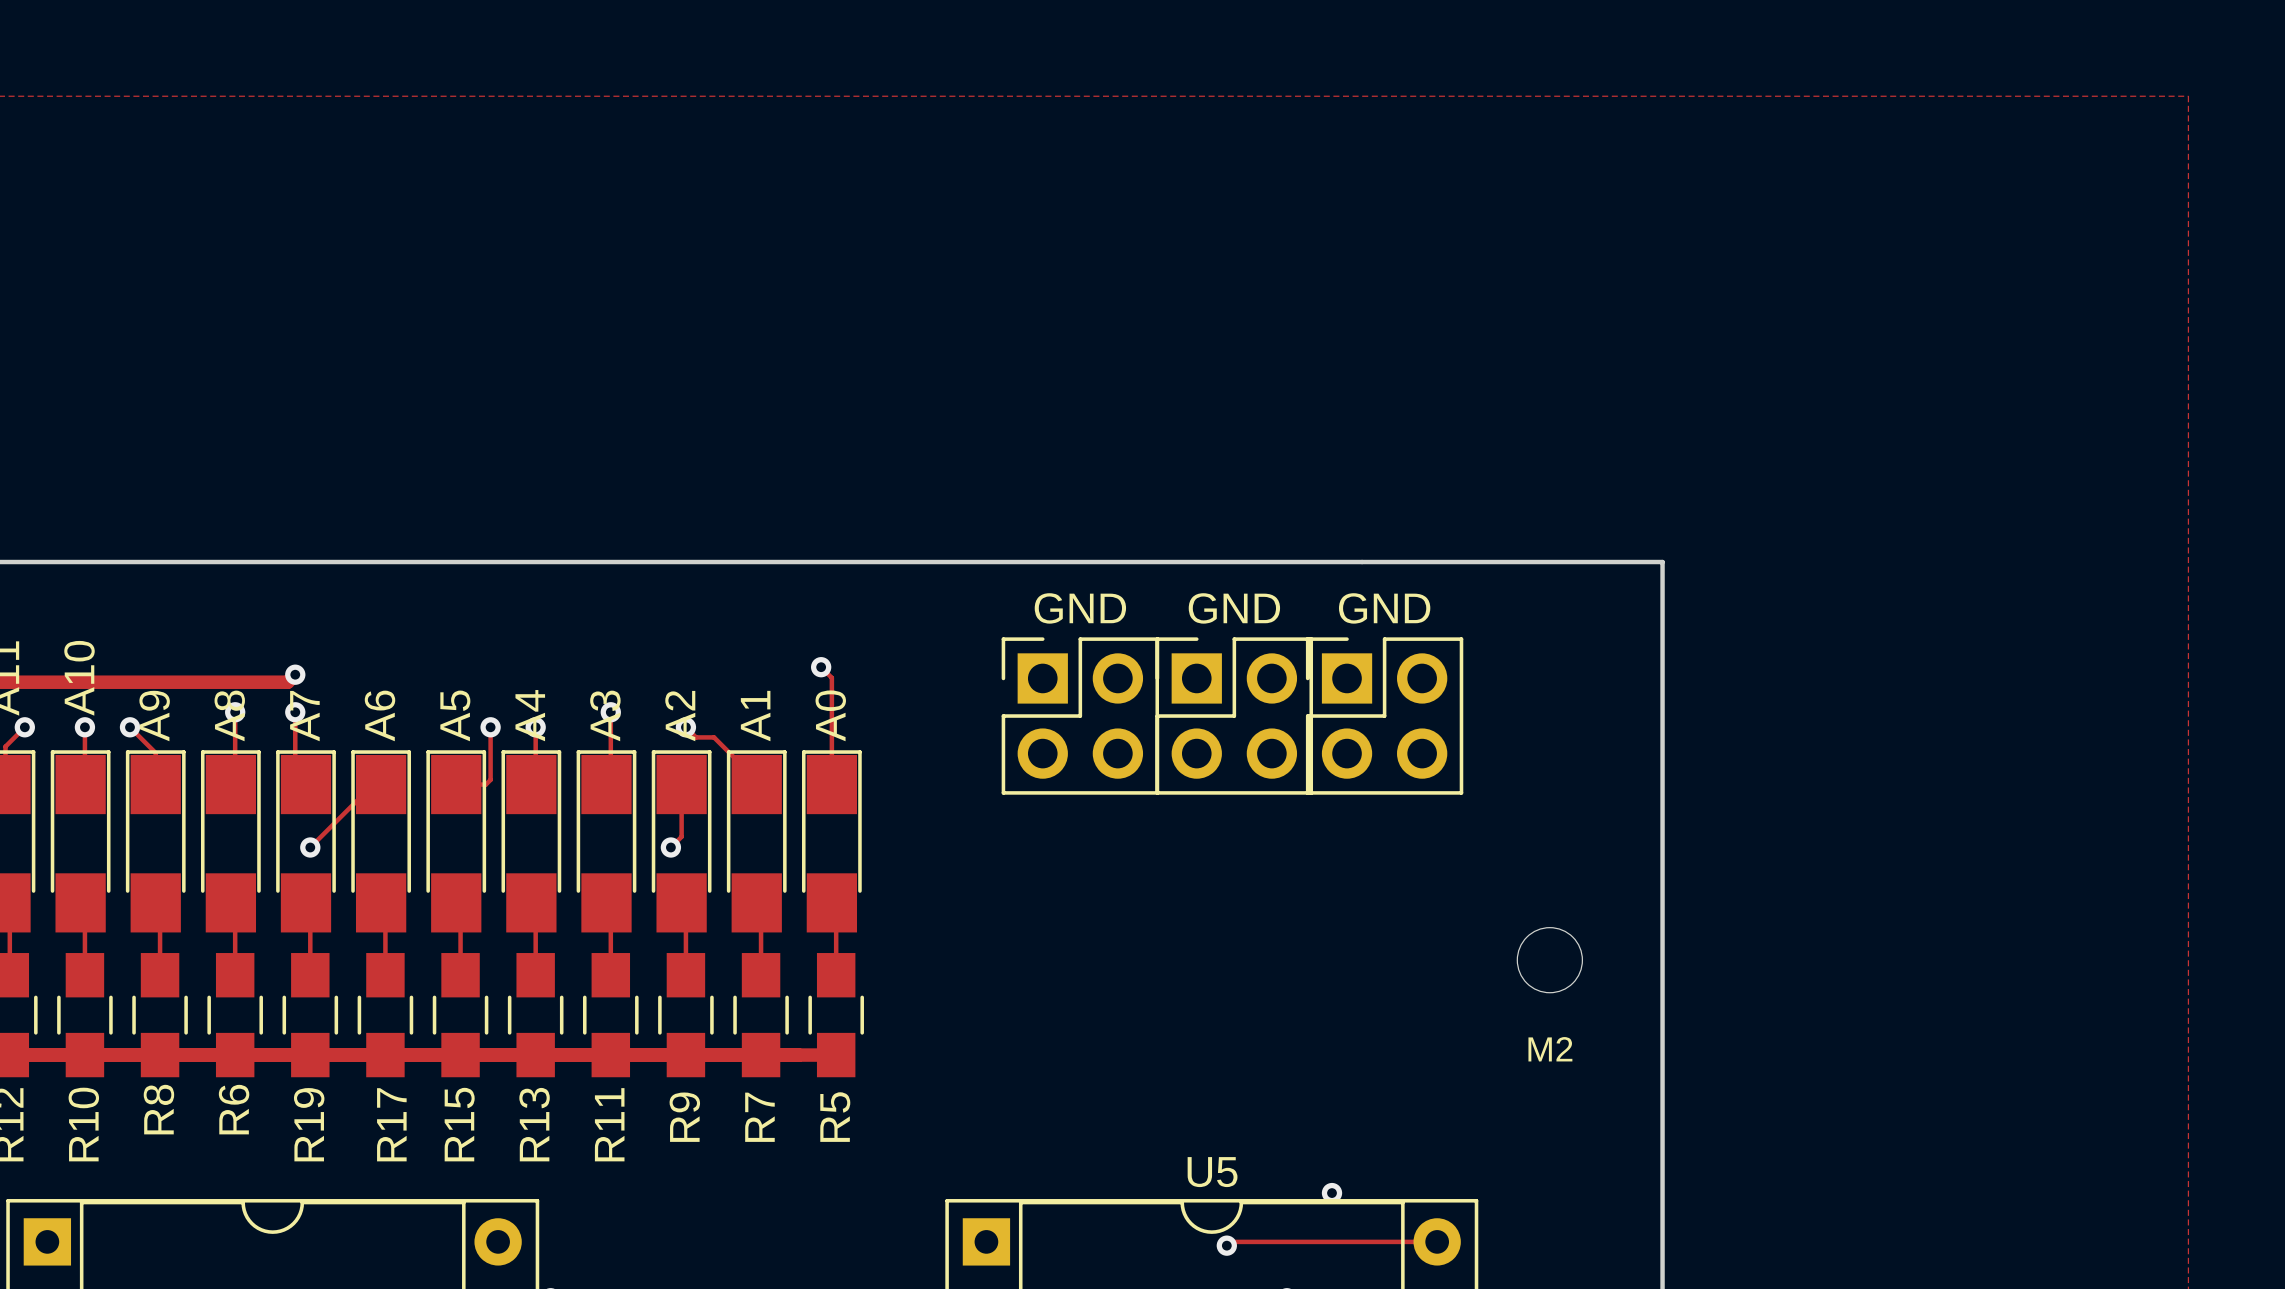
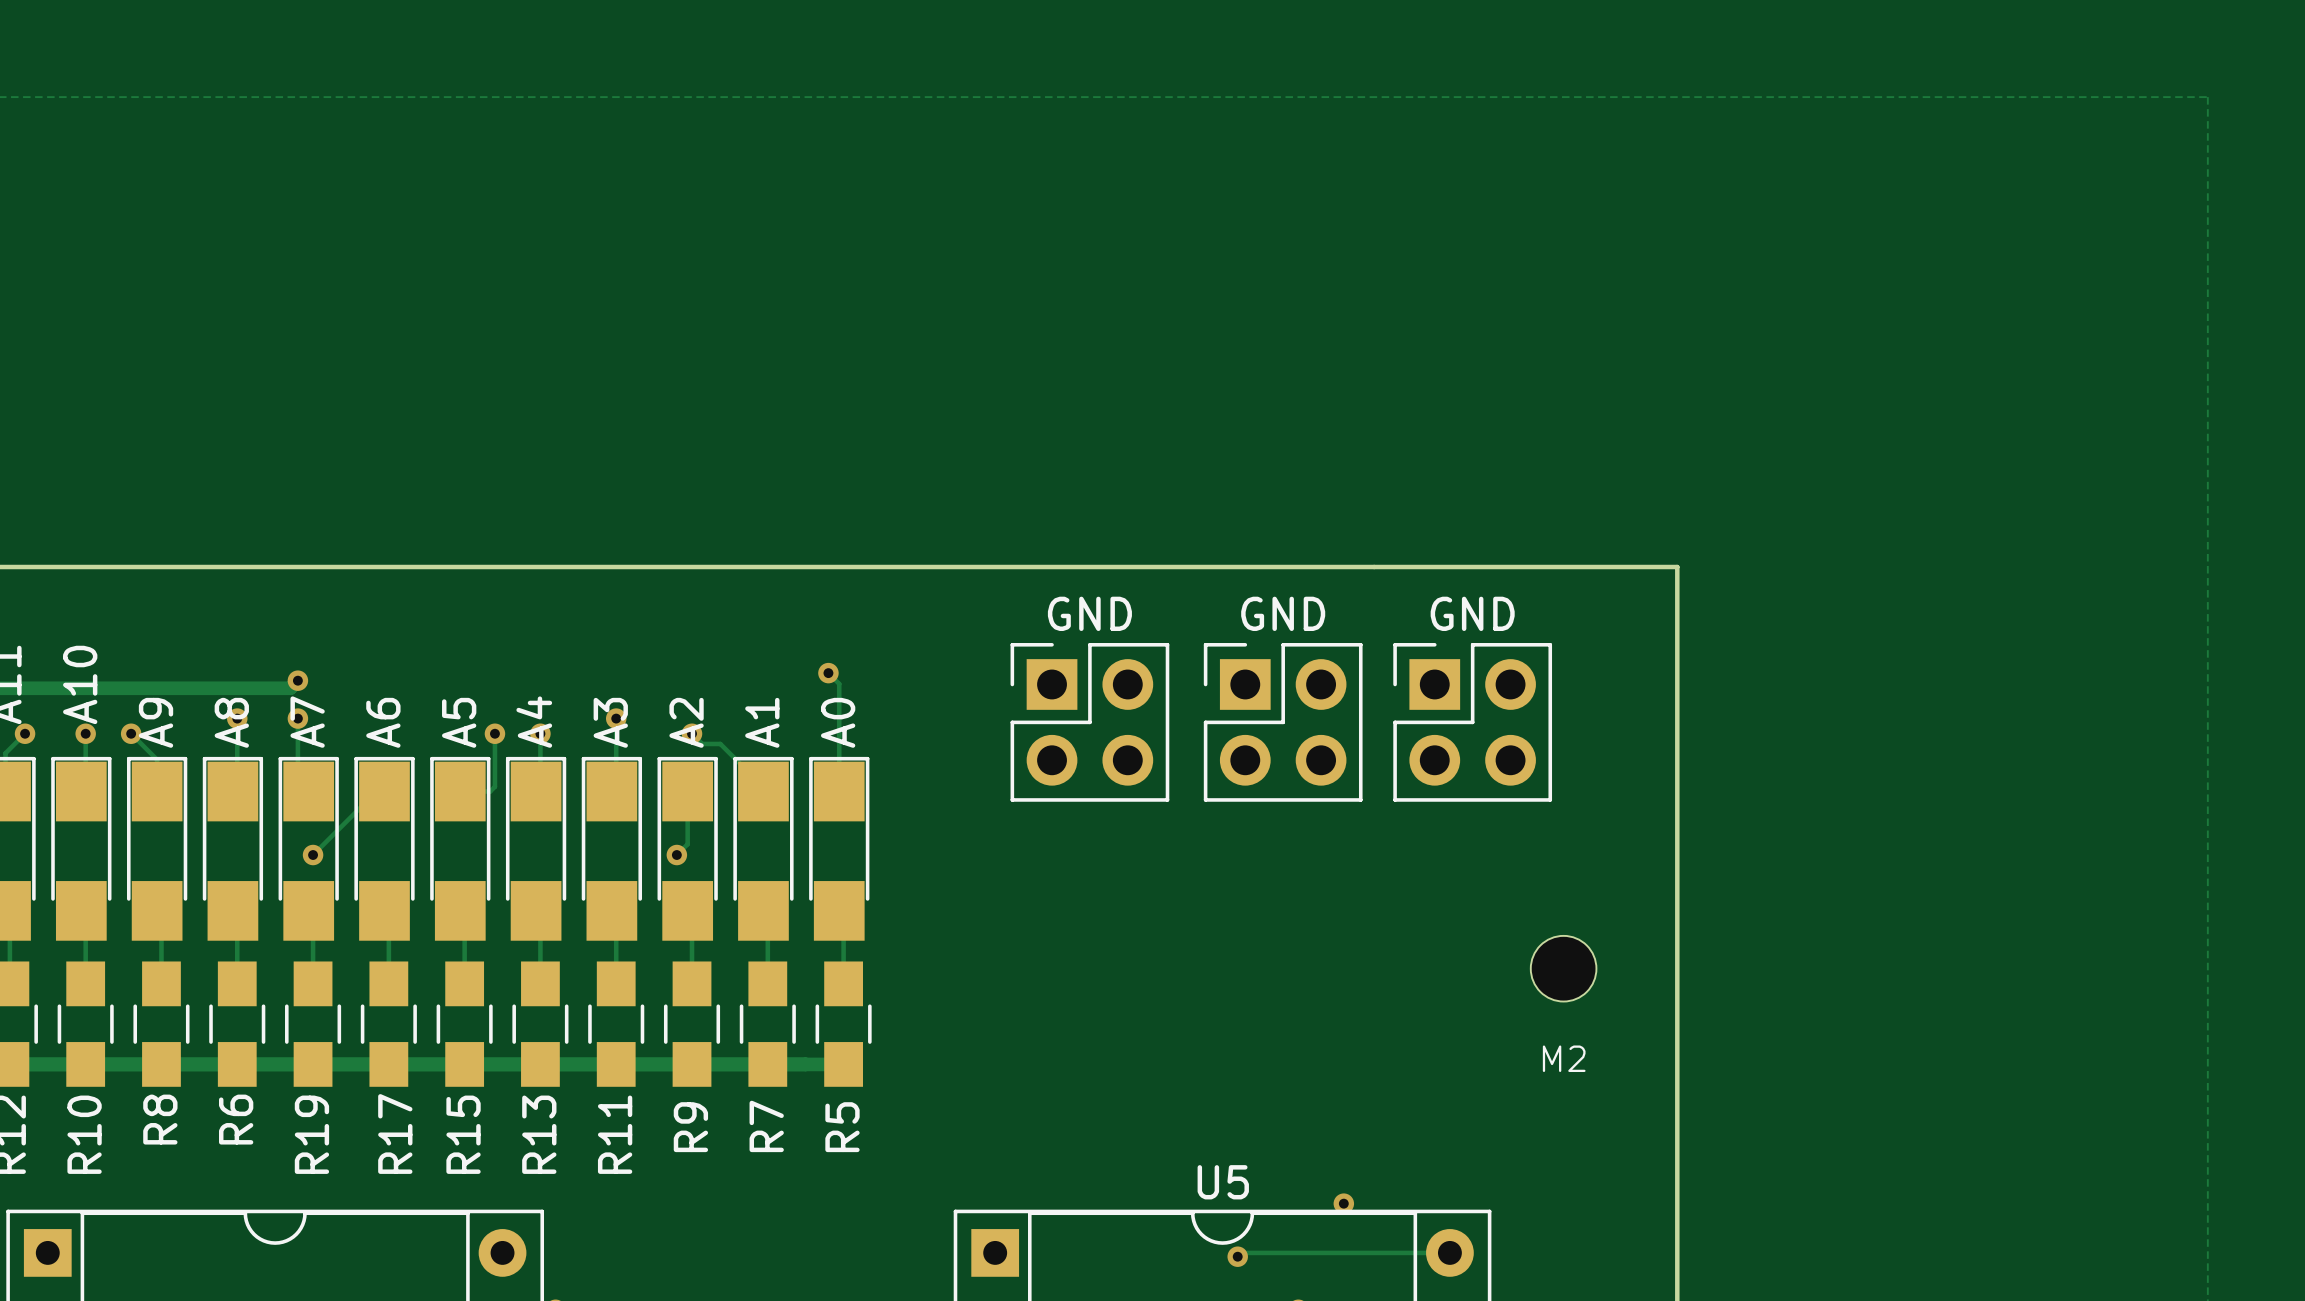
GND position: (1234, 716) -> (1283, 722)
GND: (1384, 716) -> none
GND: none -> (1472, 722)

